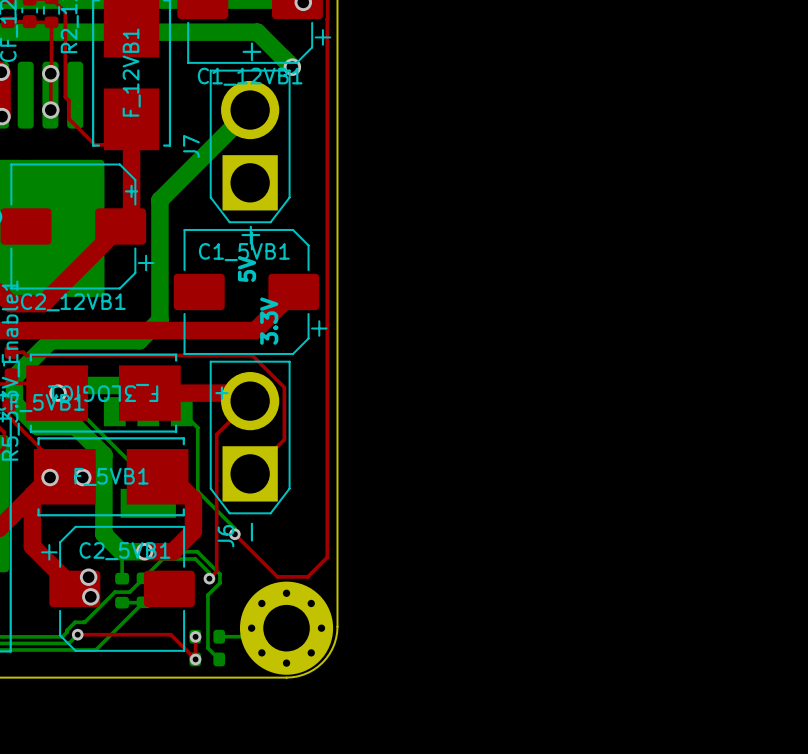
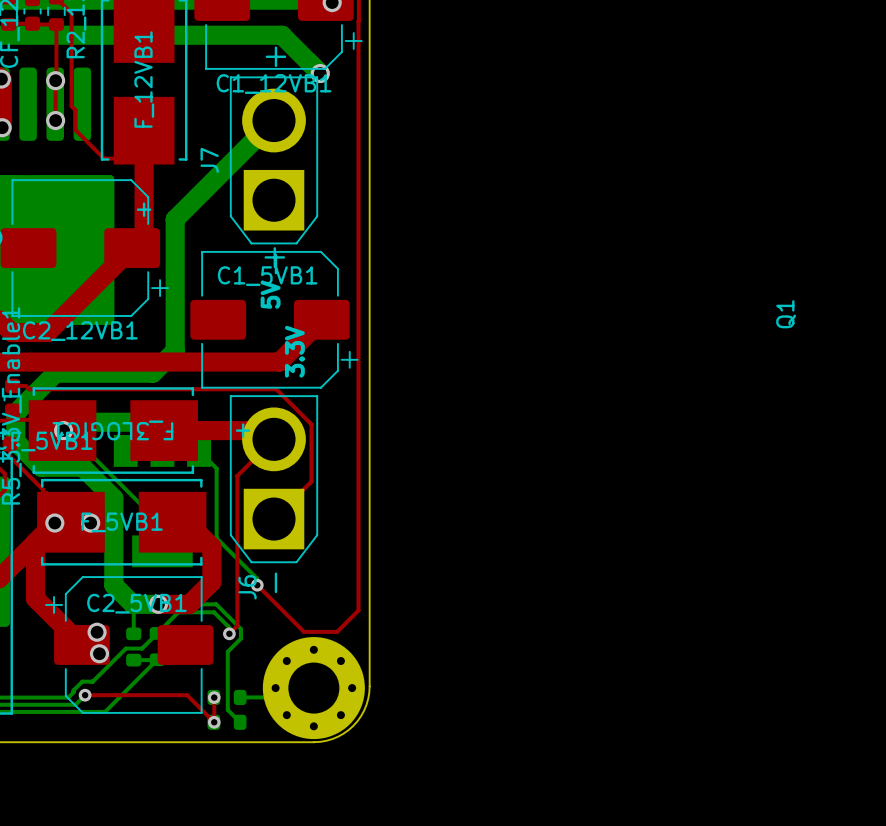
text: none -> Q1 (786, 314)

